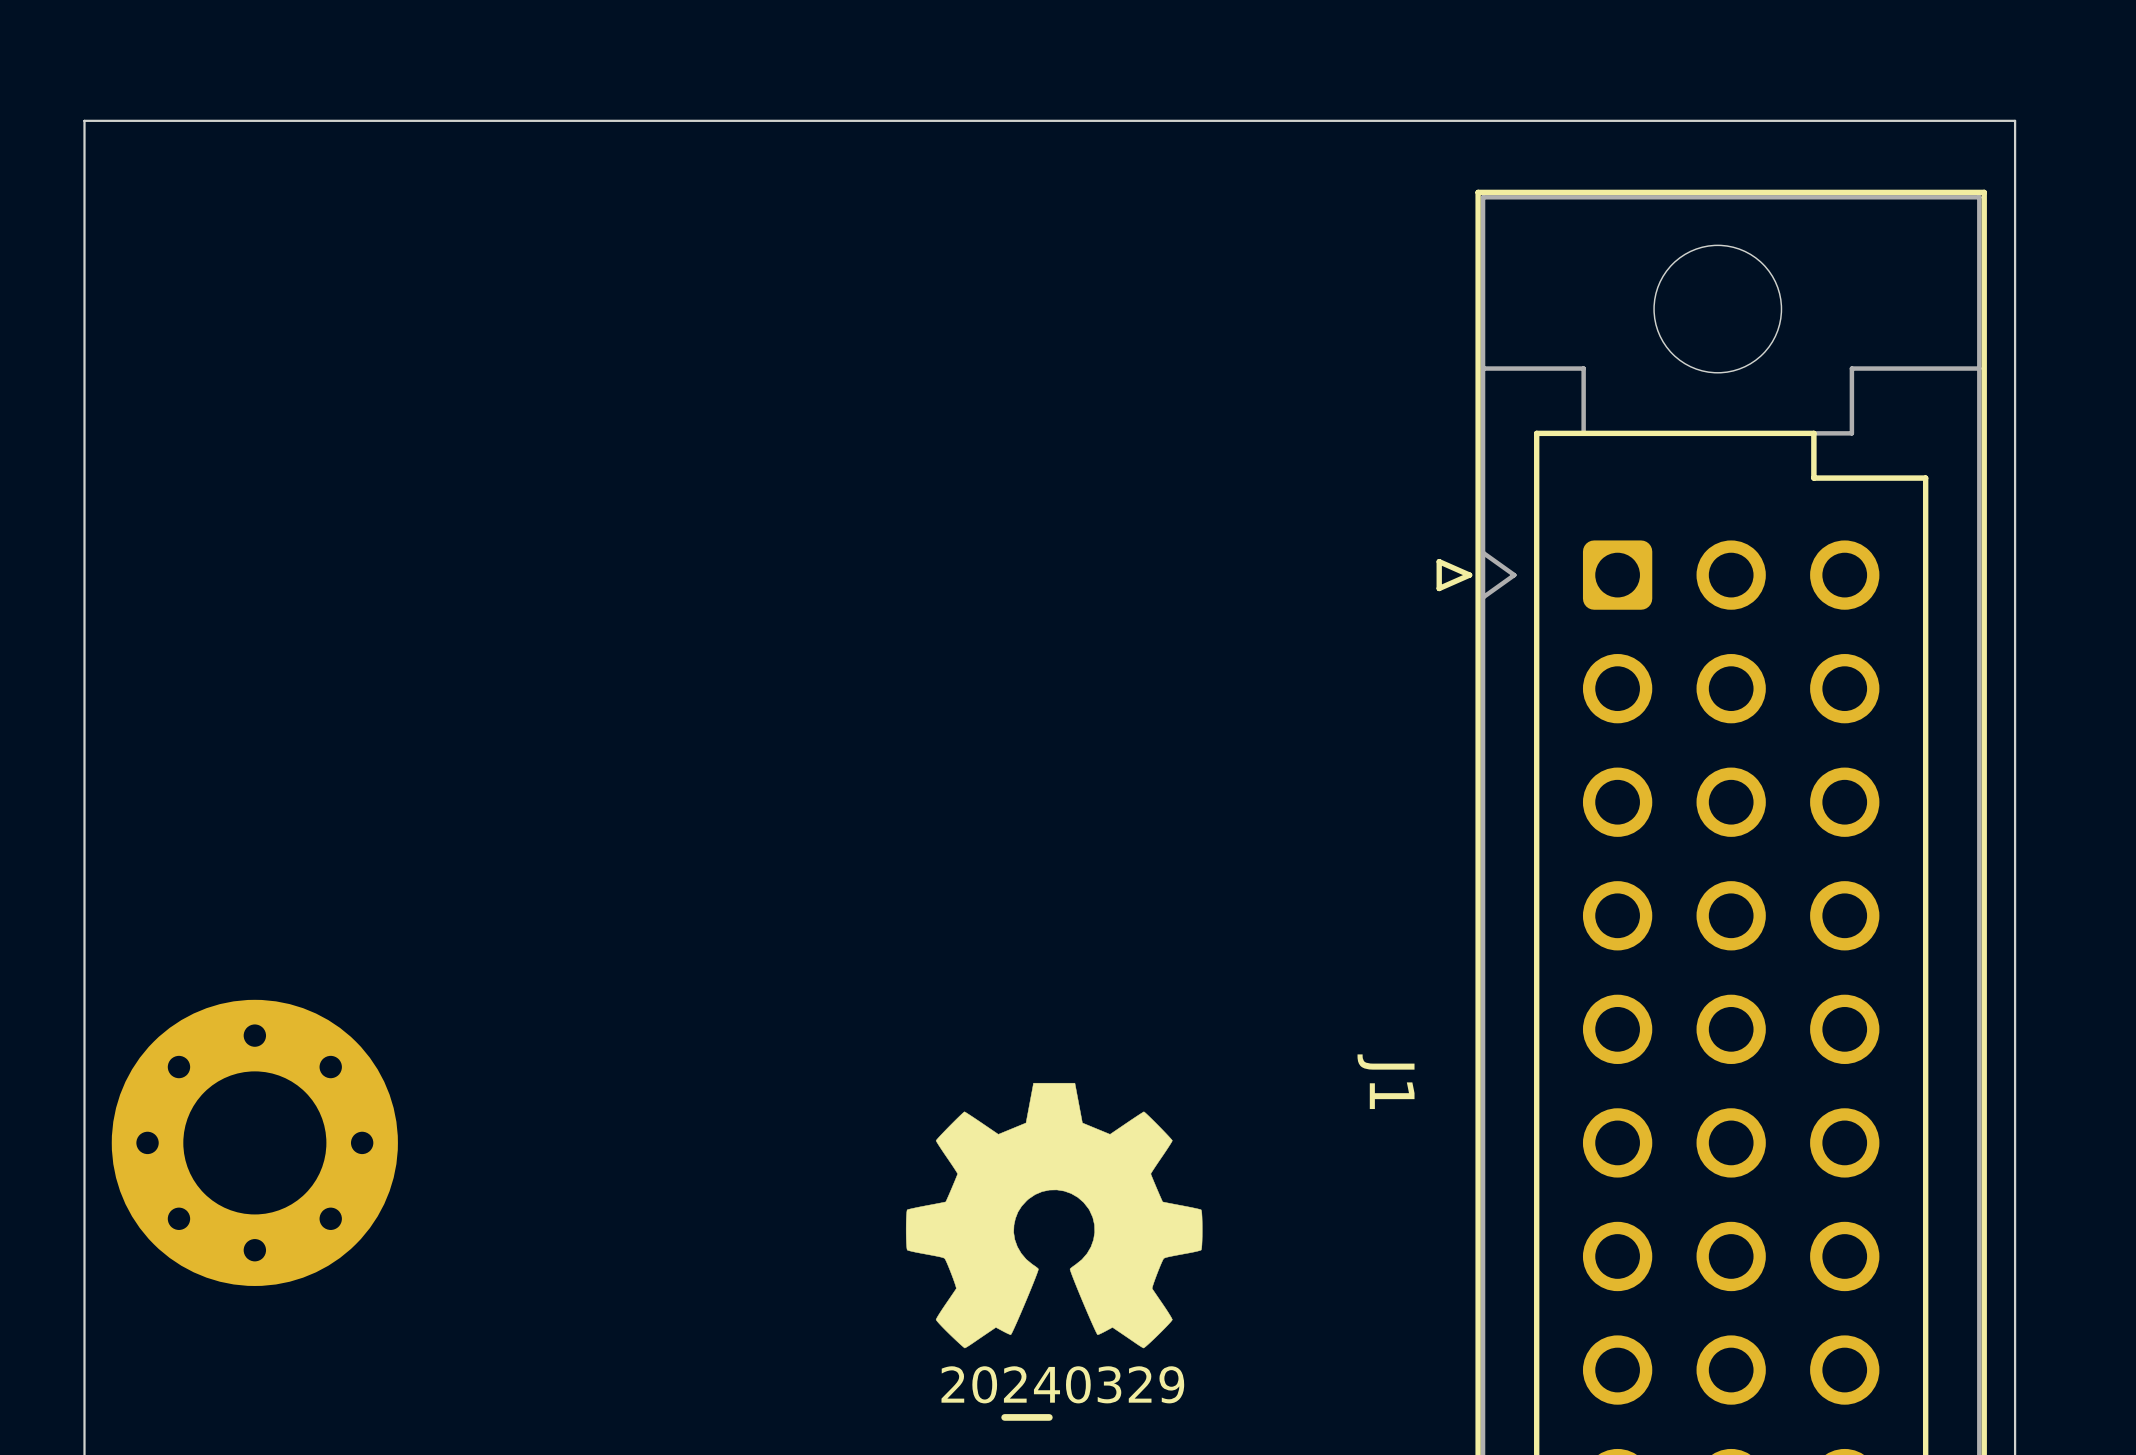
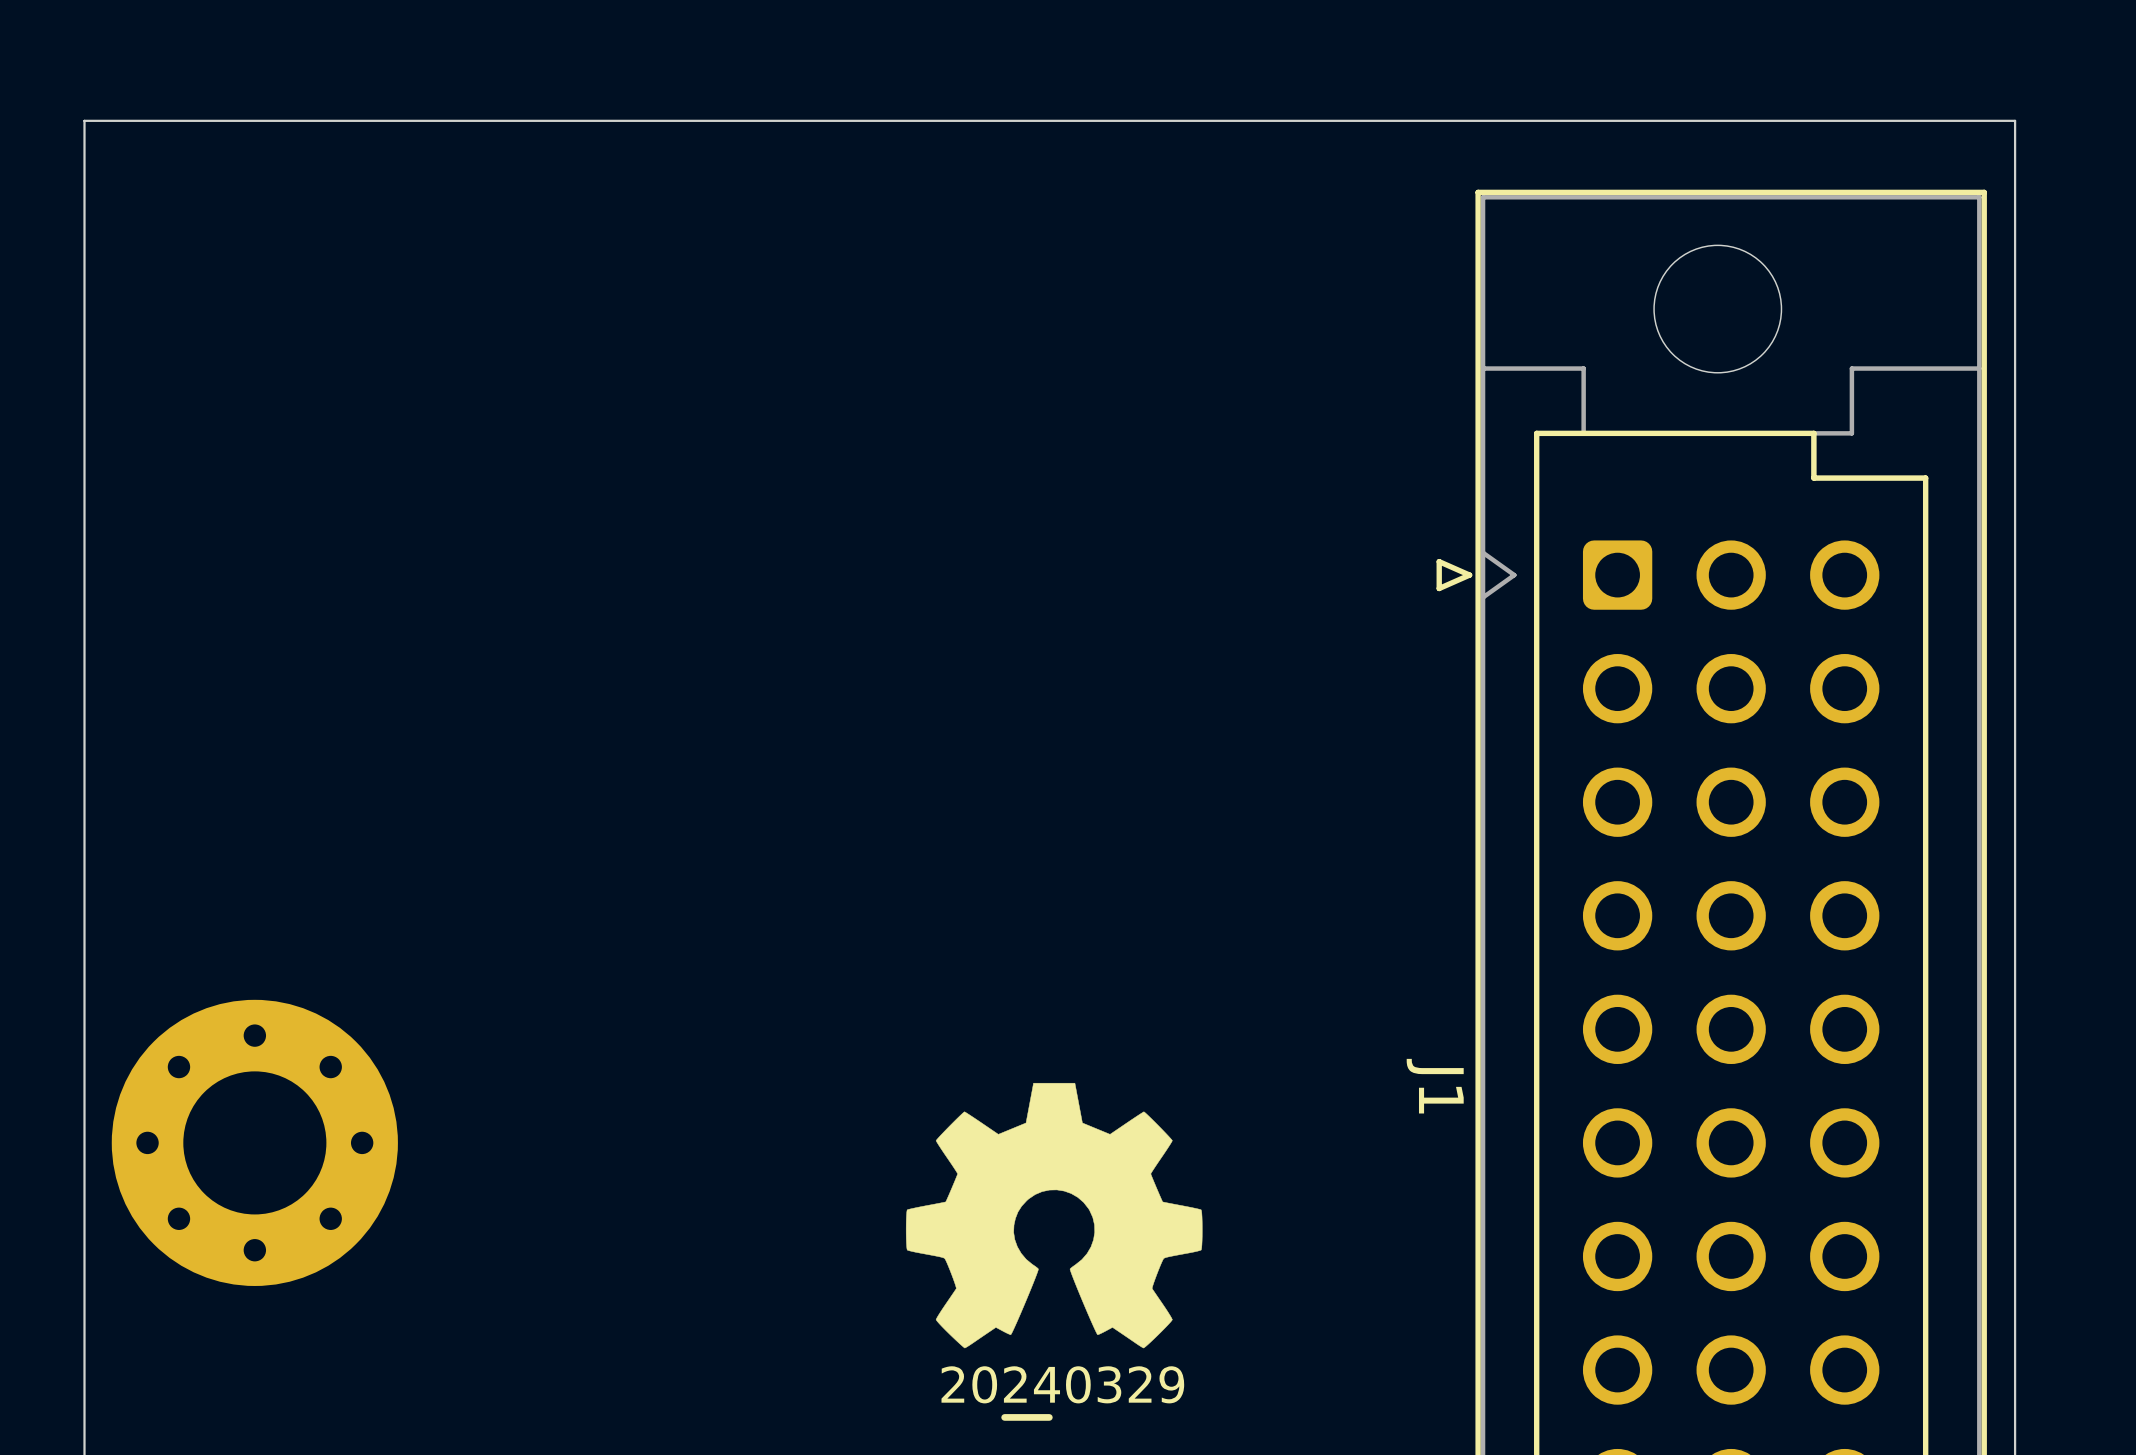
J1 name position: J1 (1386, 1081) -> J1 (1435, 1086)

